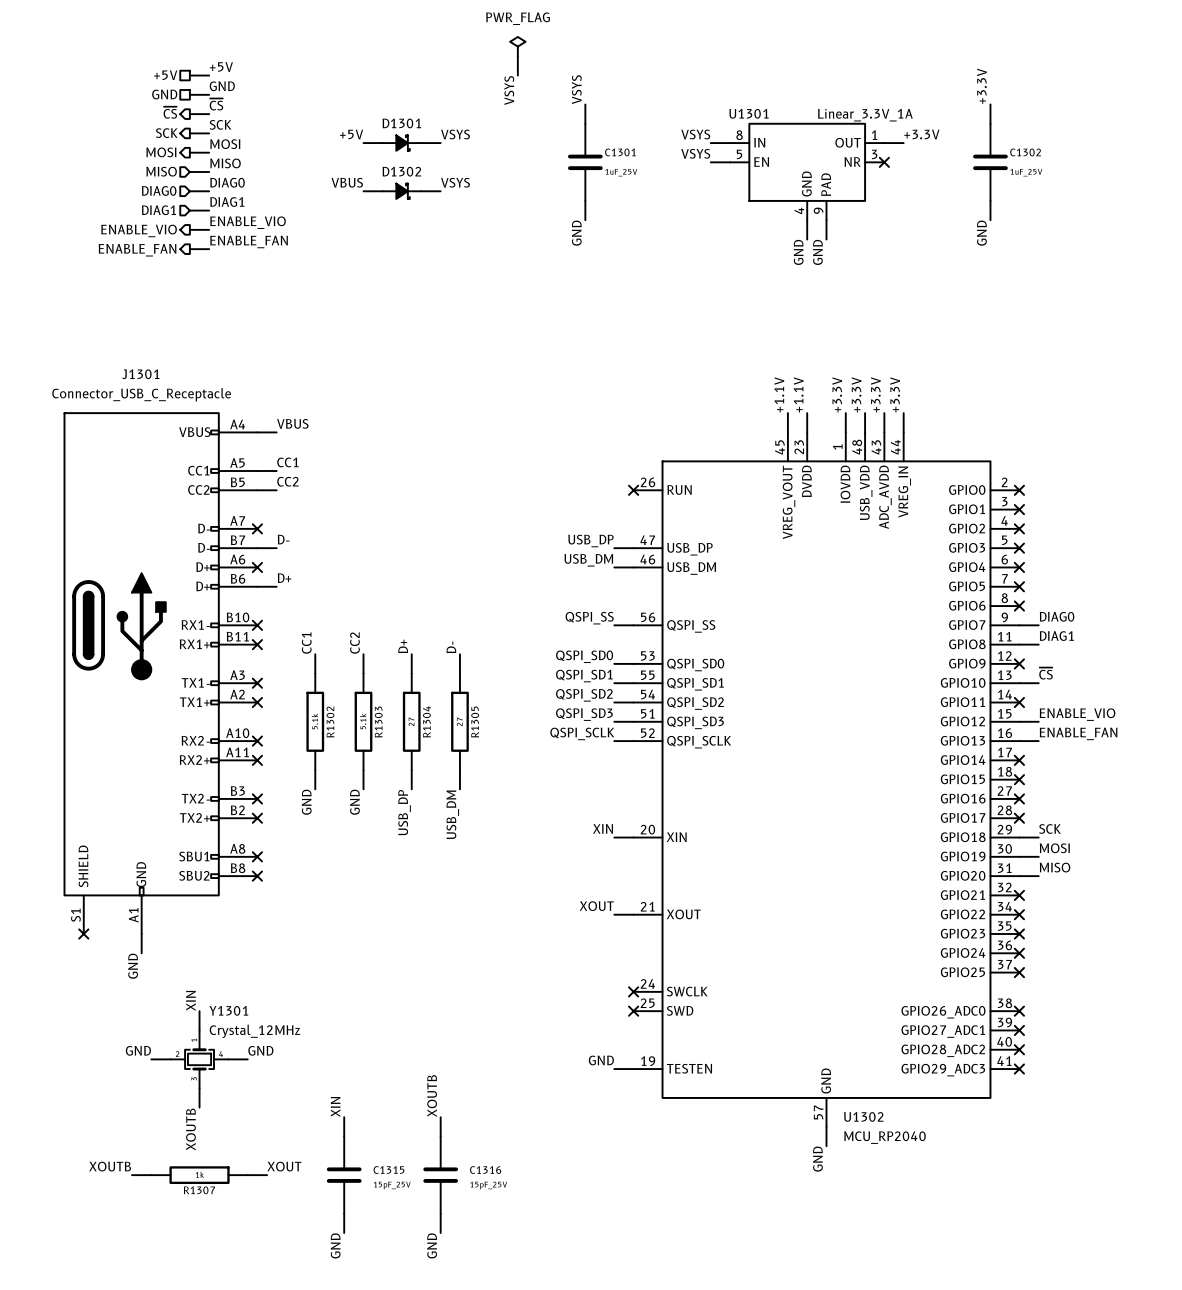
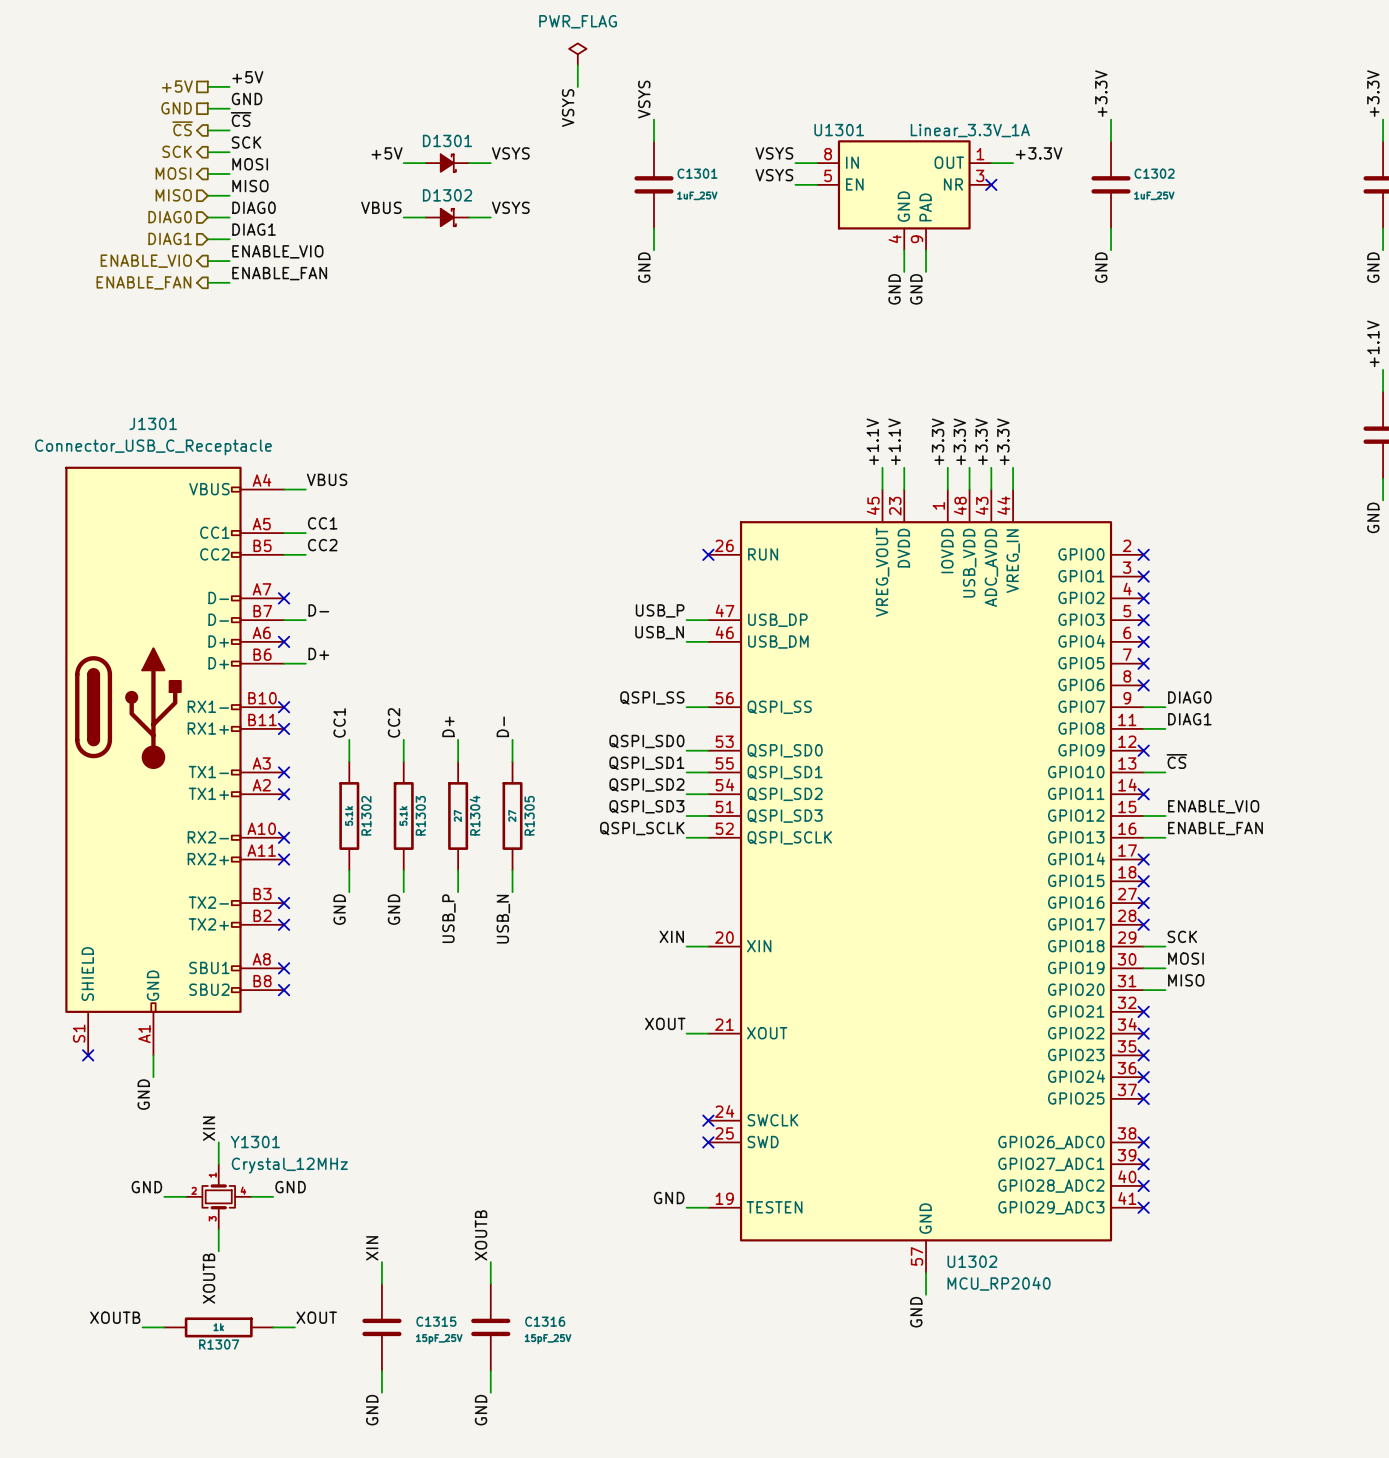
label: USB_DP (590, 541) -> USB_P (660, 610)
label: USB_DM (588, 560) -> USB_N (659, 632)
label: USB_DP (404, 812) -> USB_P (448, 918)
label: USB_DM (452, 814) -> USB_N (503, 919)

